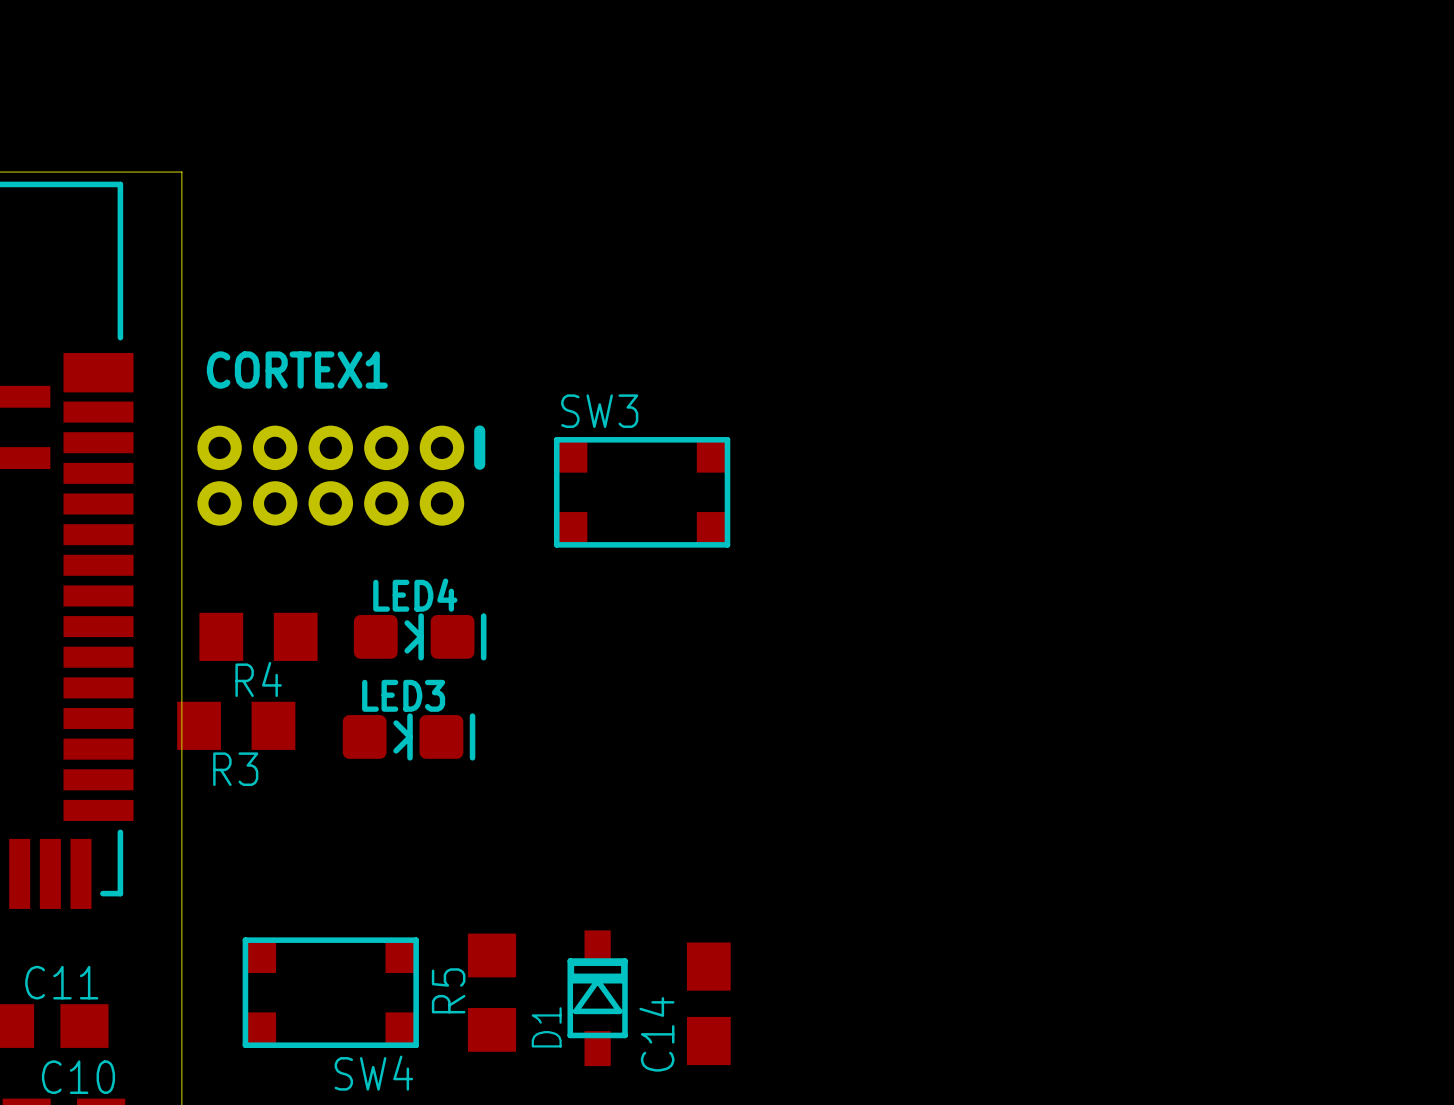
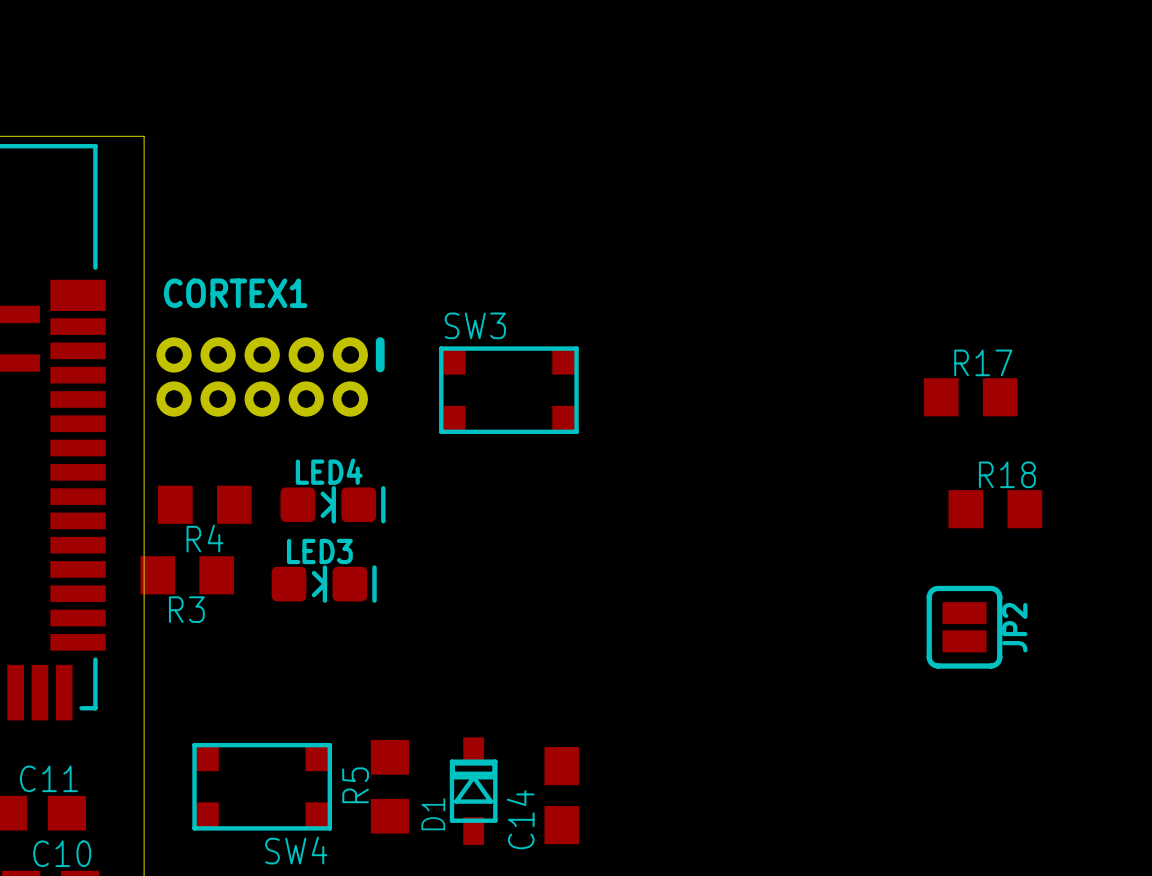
R17: none -> (970, 397)
R18: none -> (995, 509)
JP2: none -> (964, 627)

